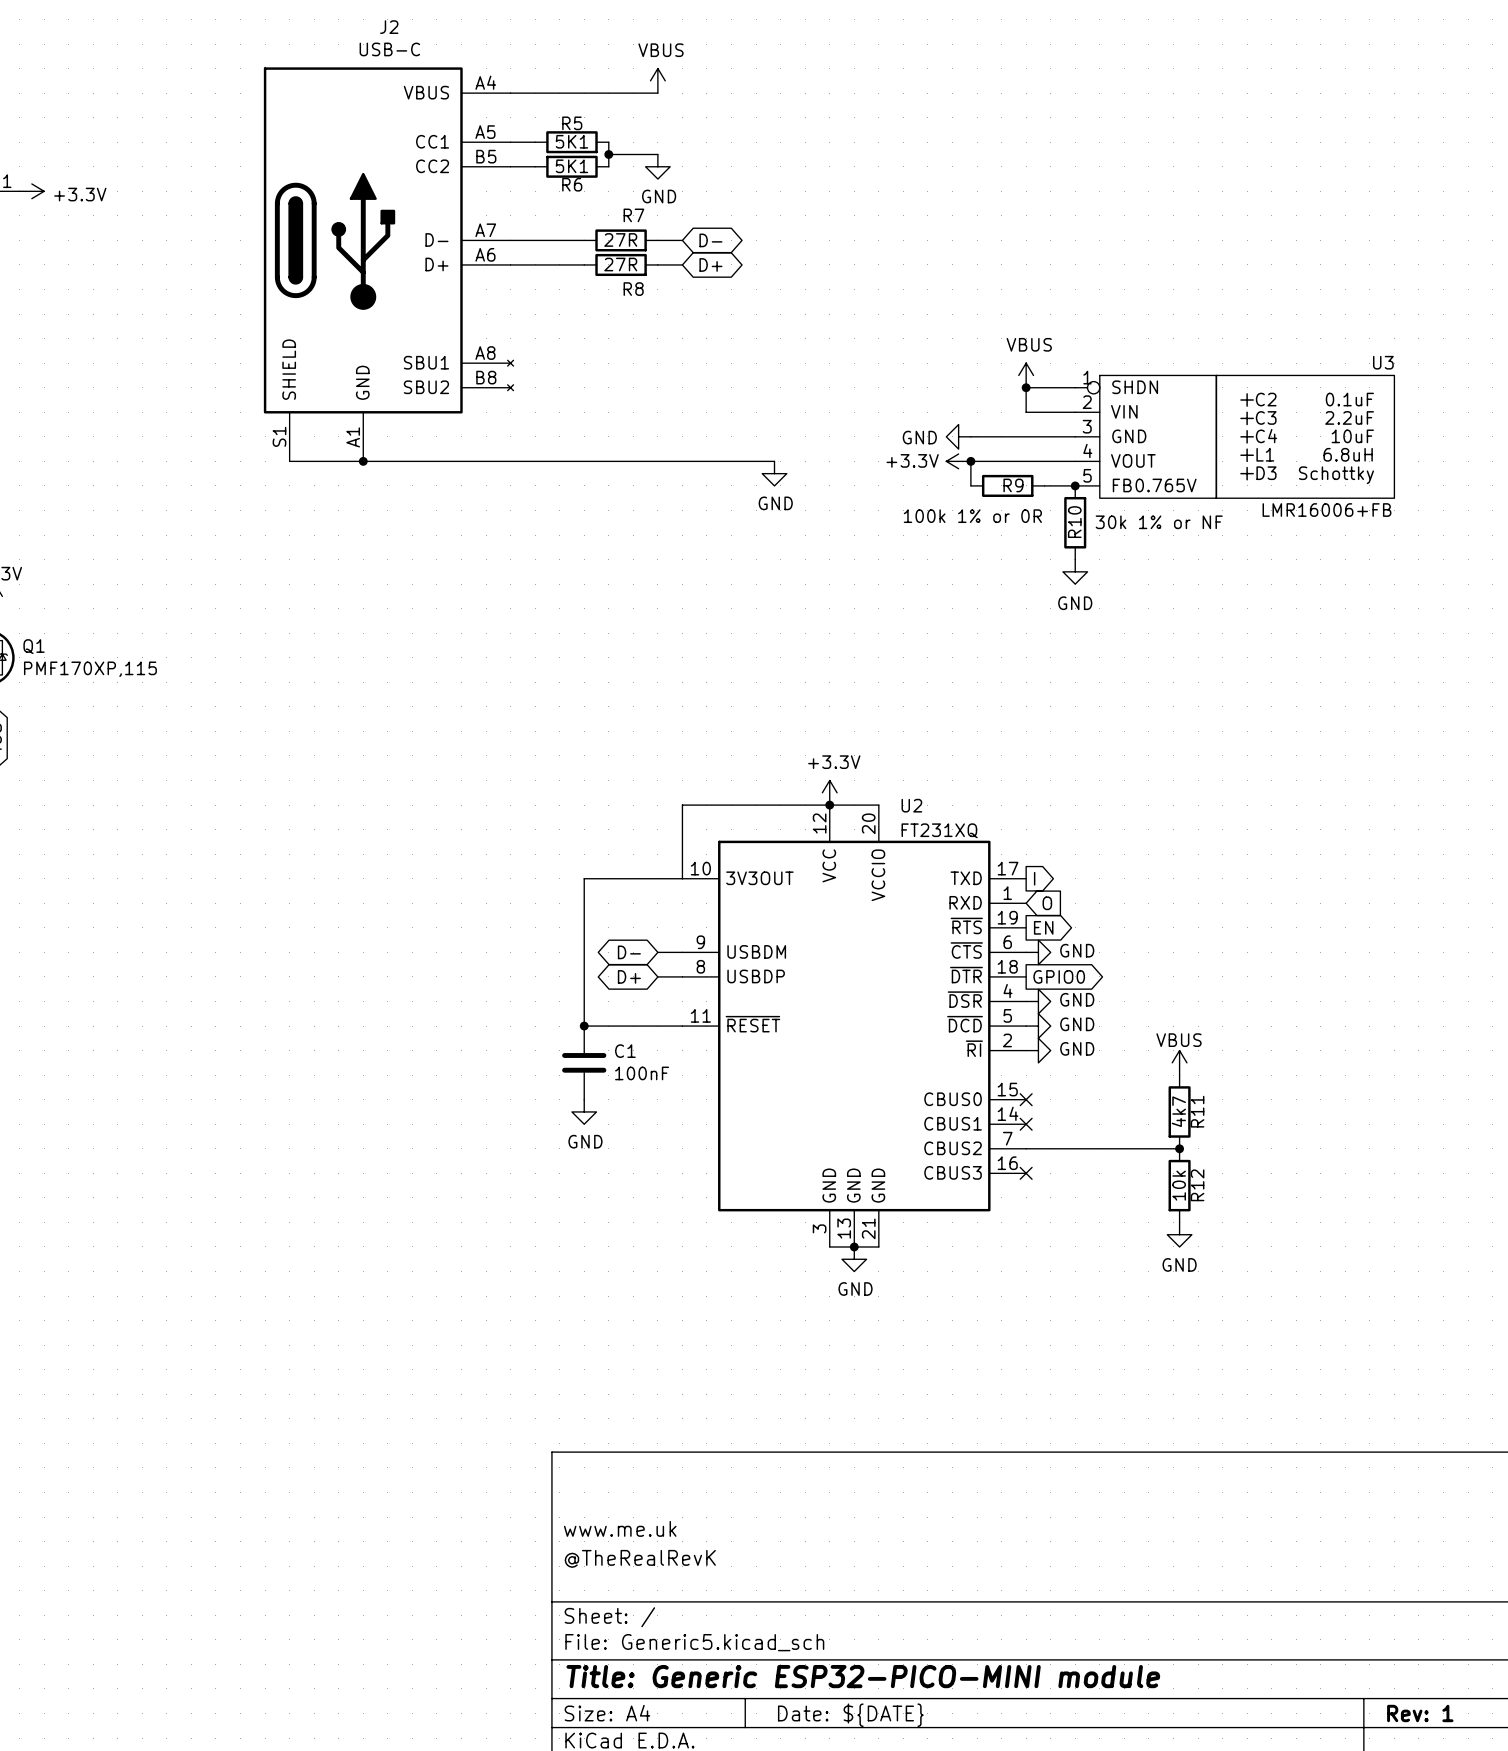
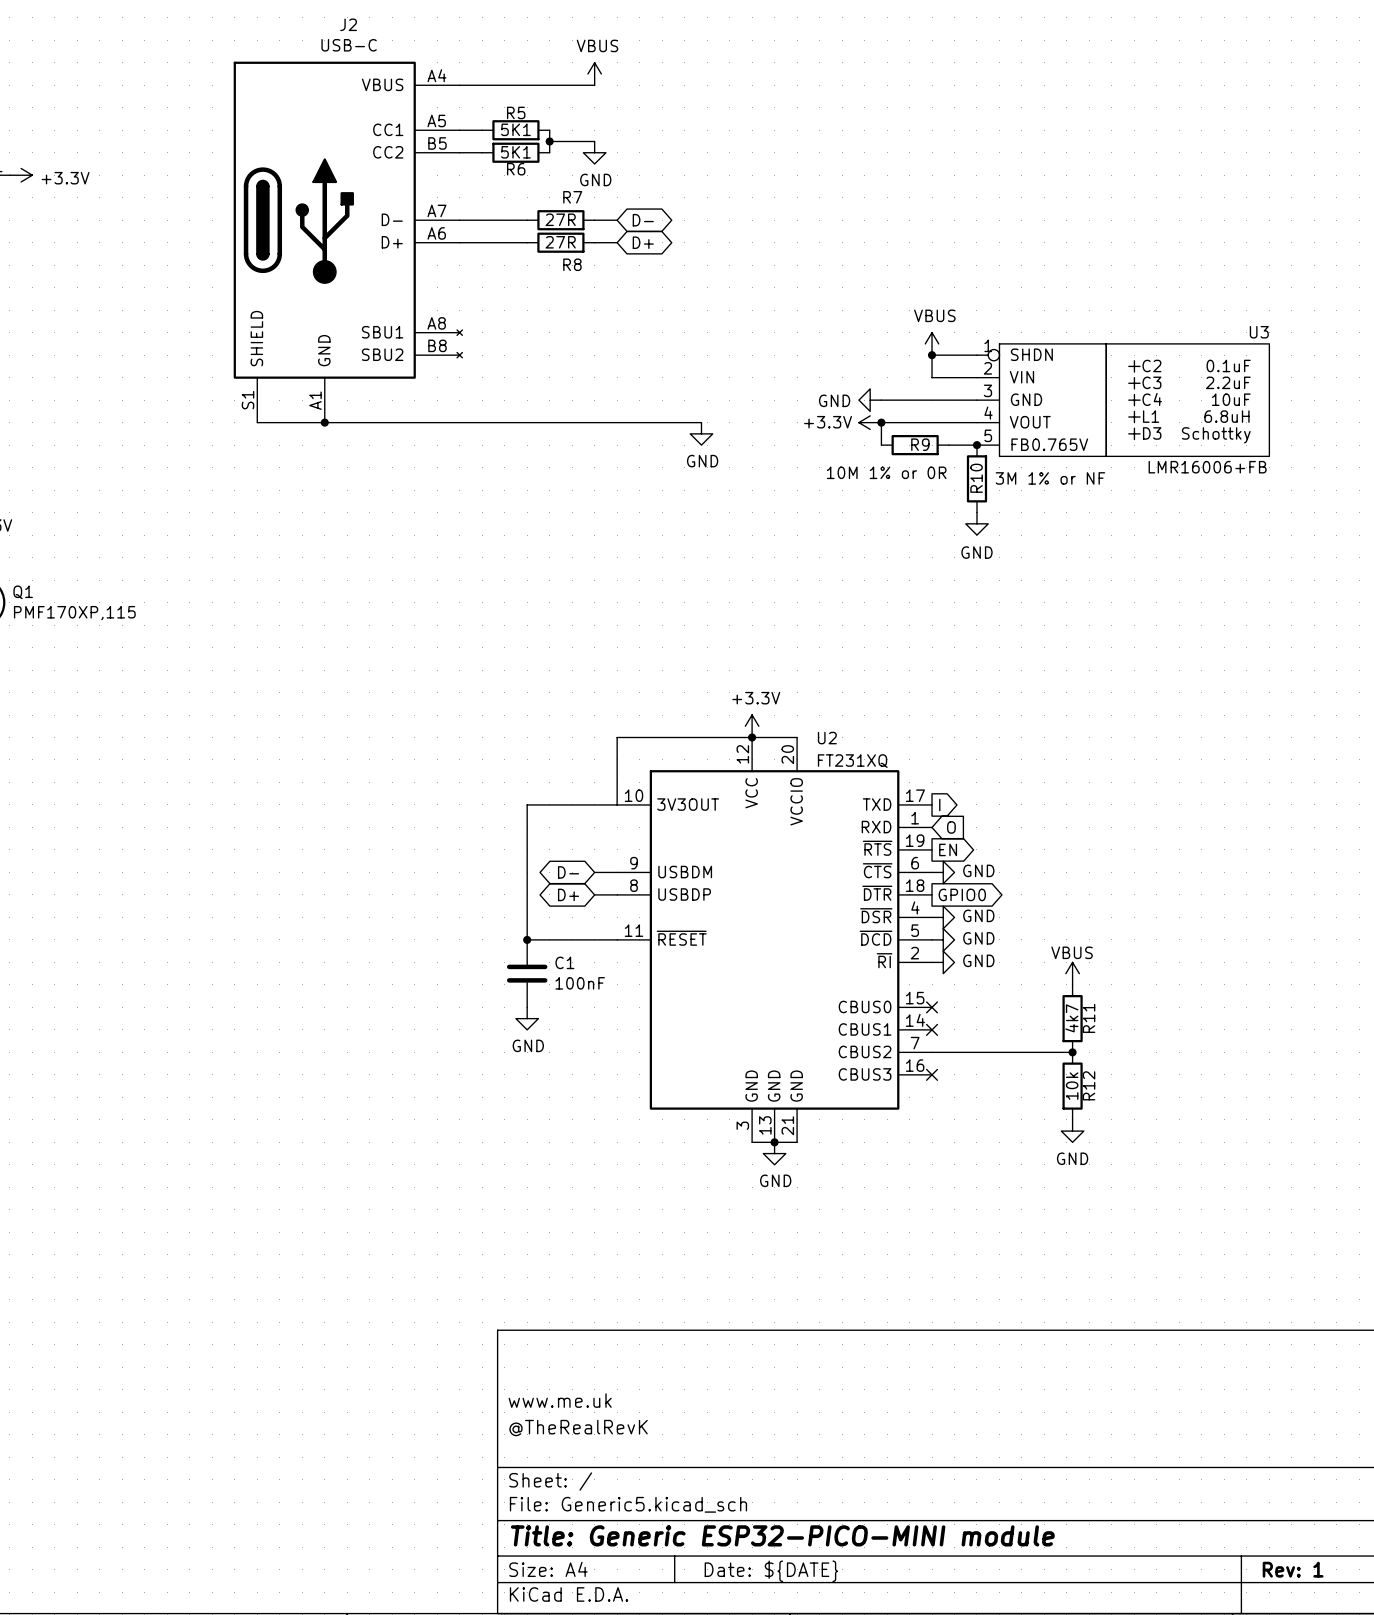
R9 value: 100k 1% or 0R (972, 516) -> 10M 1% or 0R (886, 472)
R10 value: 30k 1% or NF (1159, 522) -> 3M 1% or NF (1050, 478)

